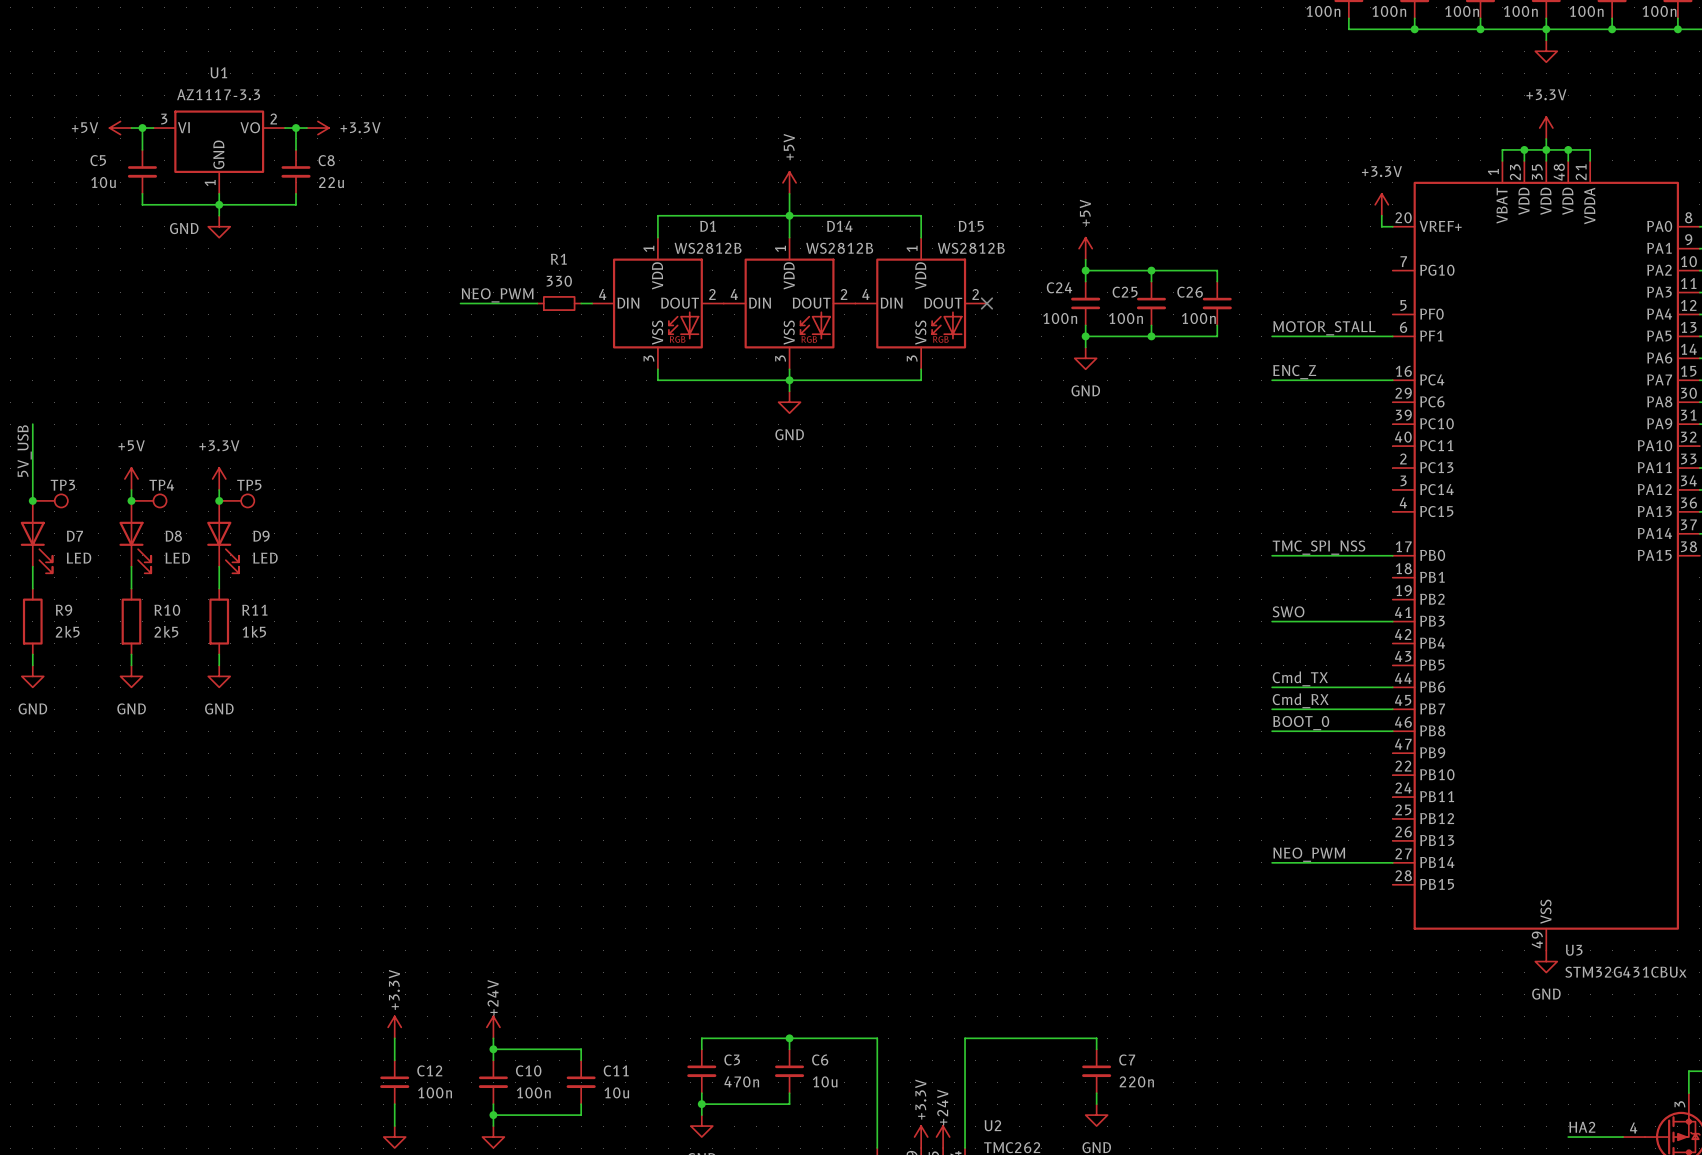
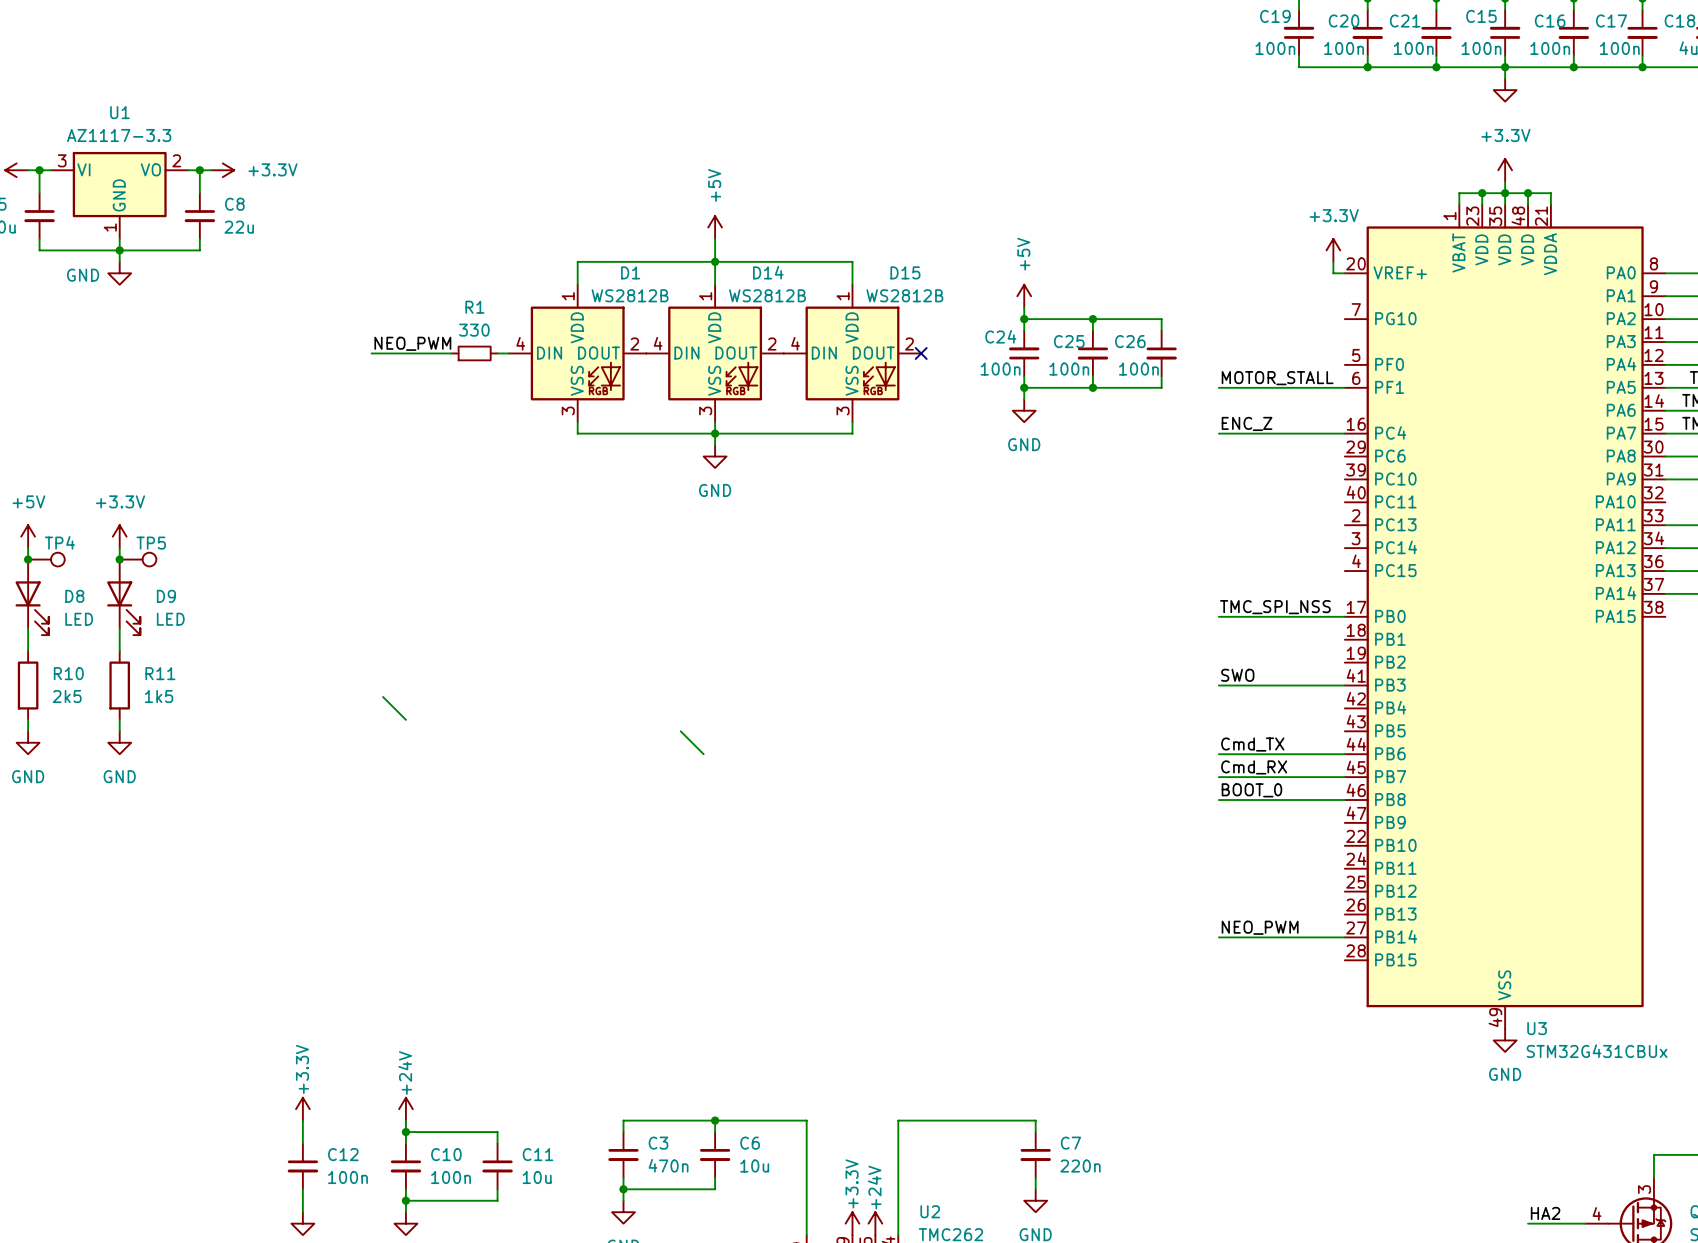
wire: none -> (383, 696) (405, 719)
wire: none -> (680, 731) (703, 754)

